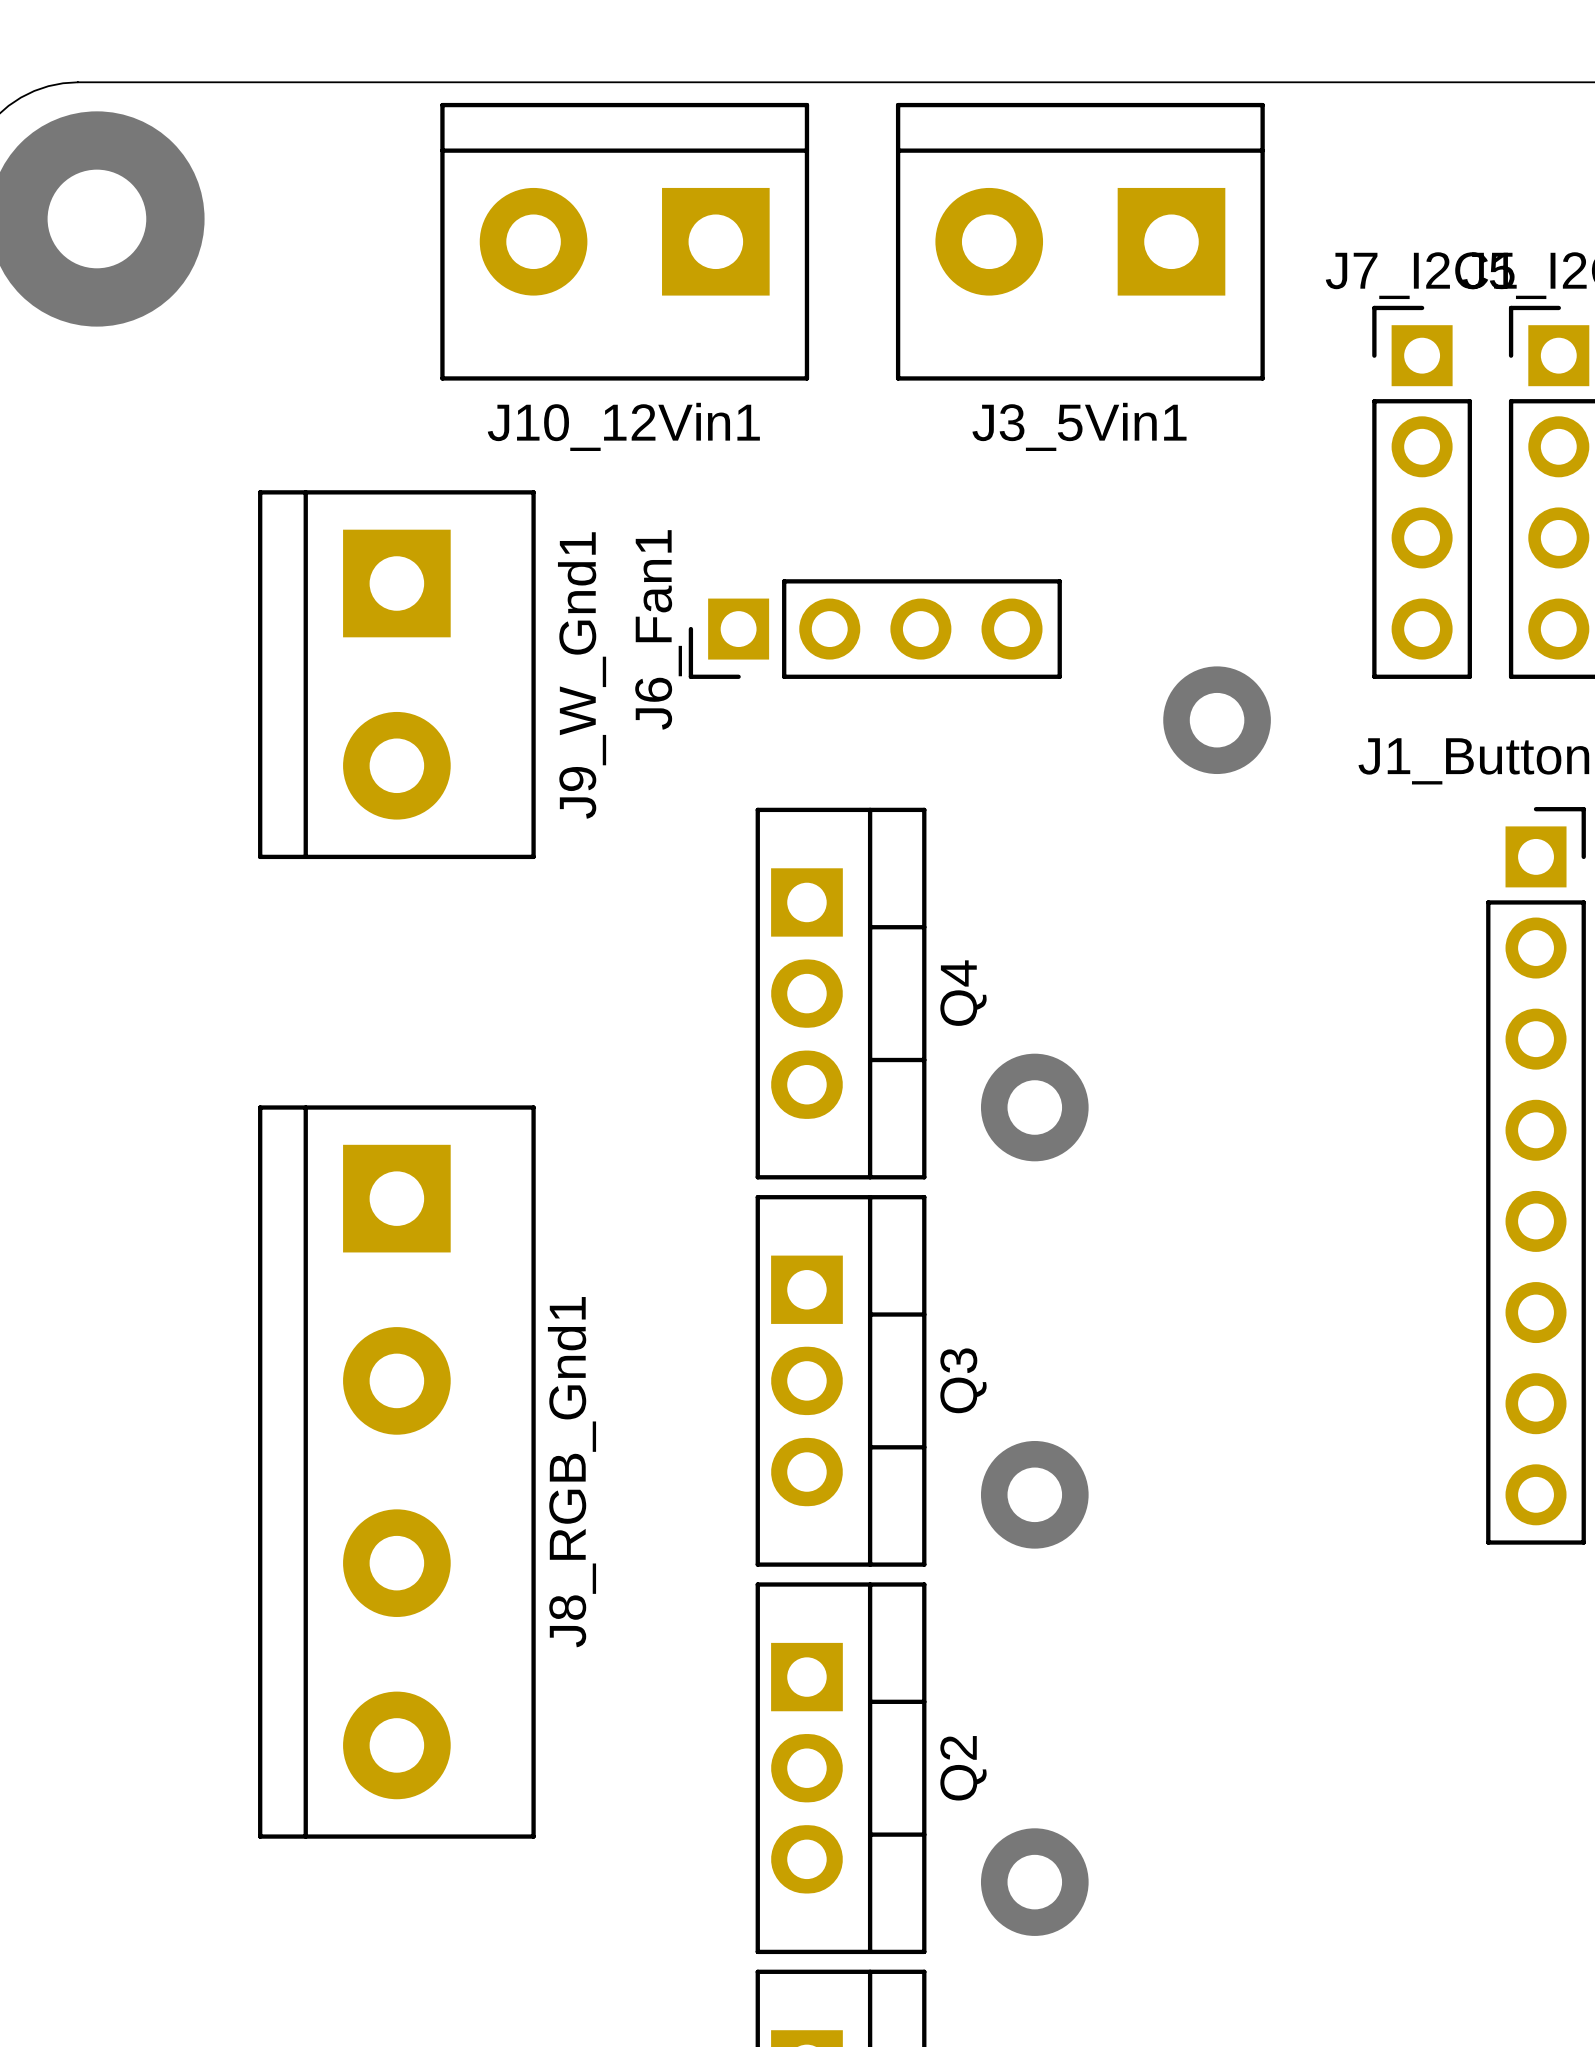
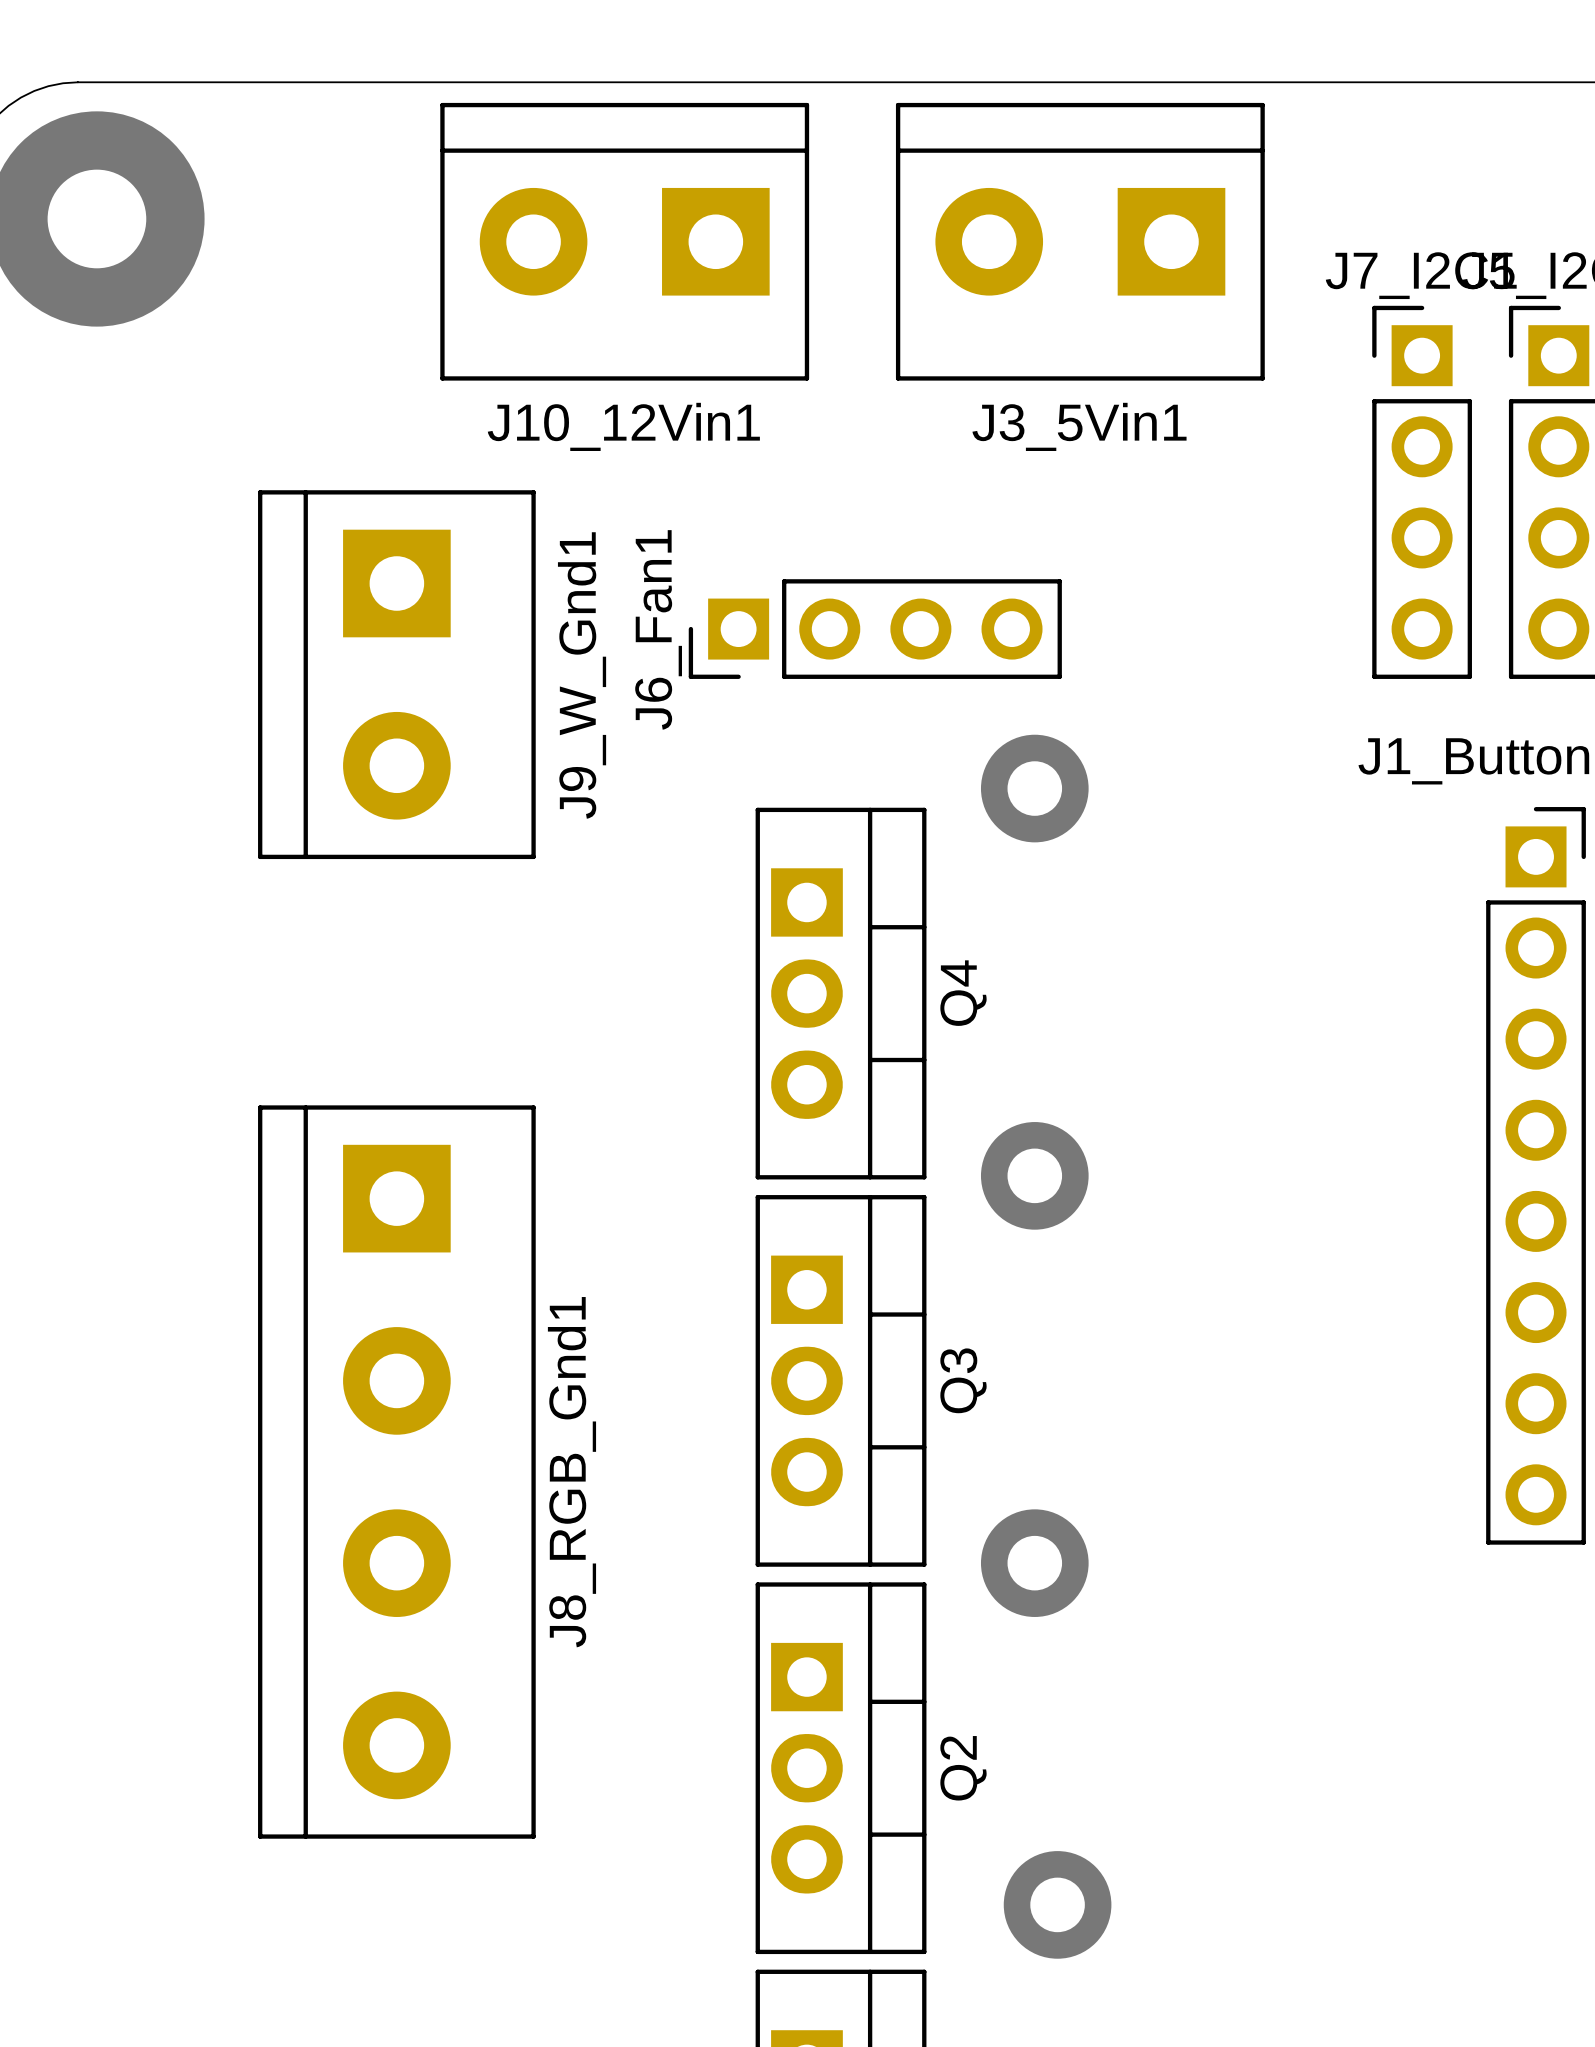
via: (1217, 720) -> none
via: none -> (1034, 788)
via position: (1034, 1107) -> (1034, 1175)
via position: (1034, 1494) -> (1034, 1563)
via position: (1034, 1882) -> (1057, 1904)

